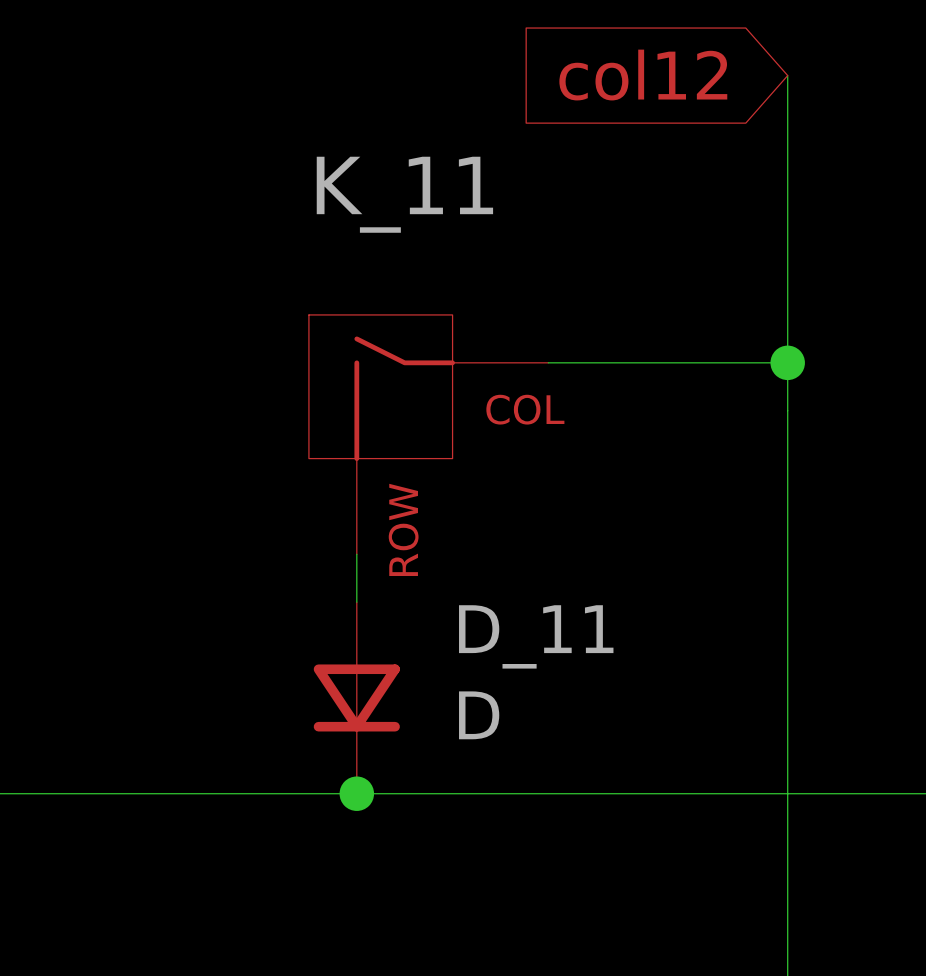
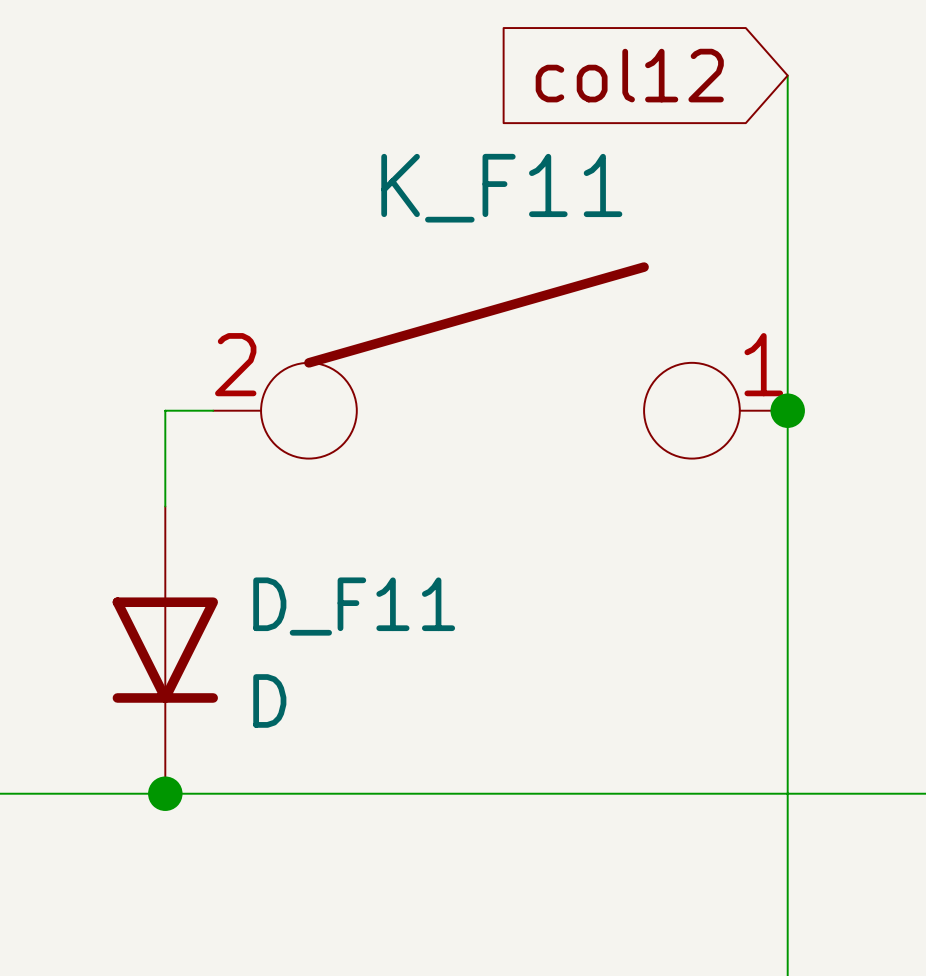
K_F11: none -> (500, 360)
wire: (548, 362) (787, 362) -> none
junction position: (787, 362) -> (787, 410)
wire: none -> (213, 410) (165, 410) (165, 506)
K_11: (428, 434) -> none
wire: (356, 554) (356, 602) -> none
D_F11: none -> D (165, 650)
D_11: D (356, 697) -> none
junction position: (356, 793) -> (165, 793)

